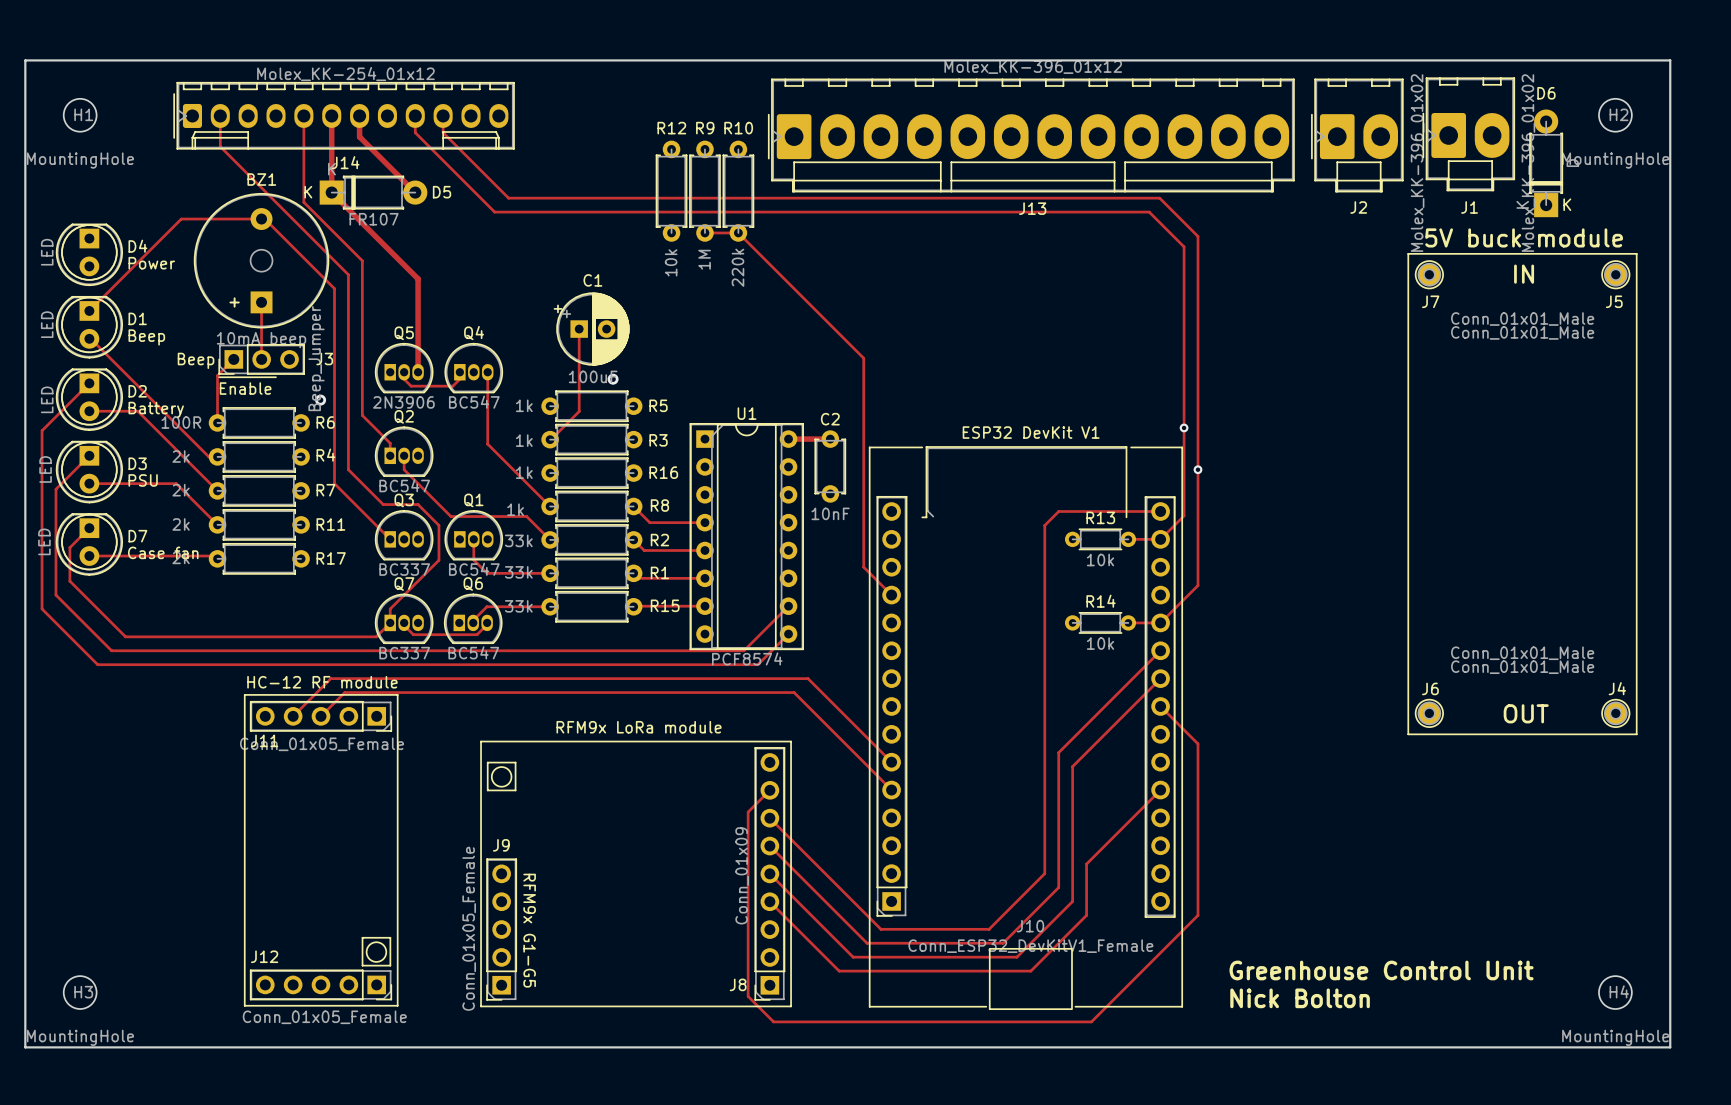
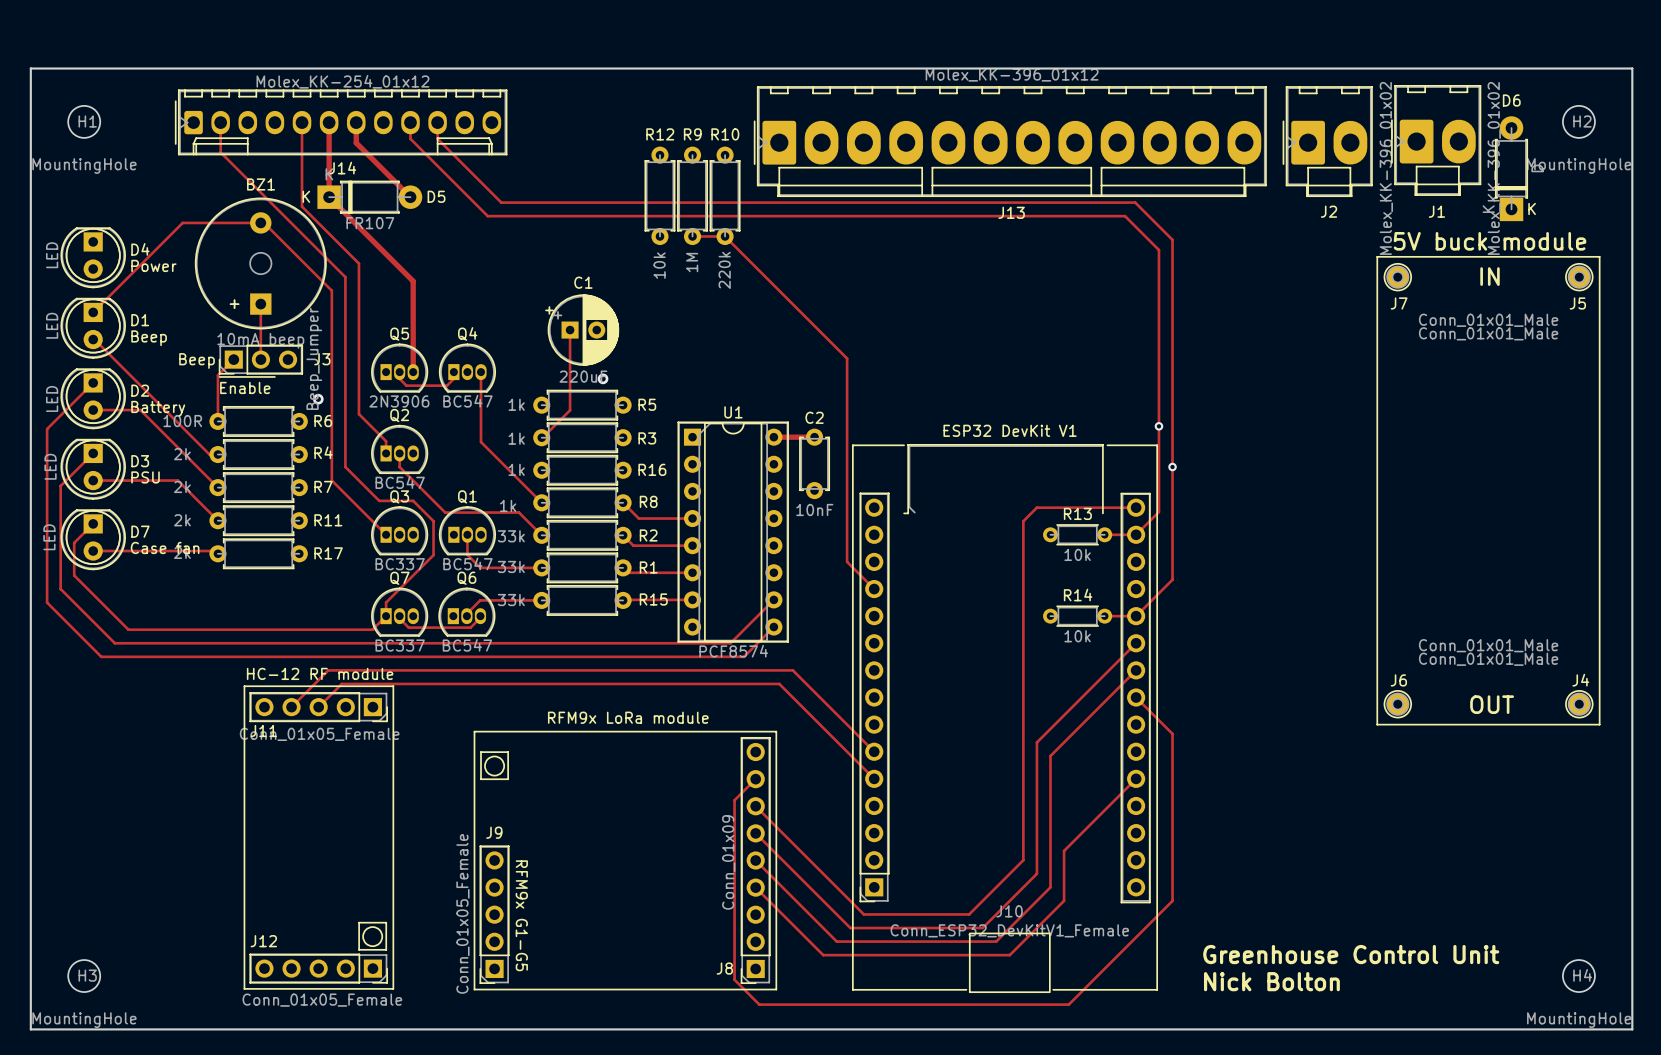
C1 value: 100uF (593, 376) -> 220uF (583, 376)

